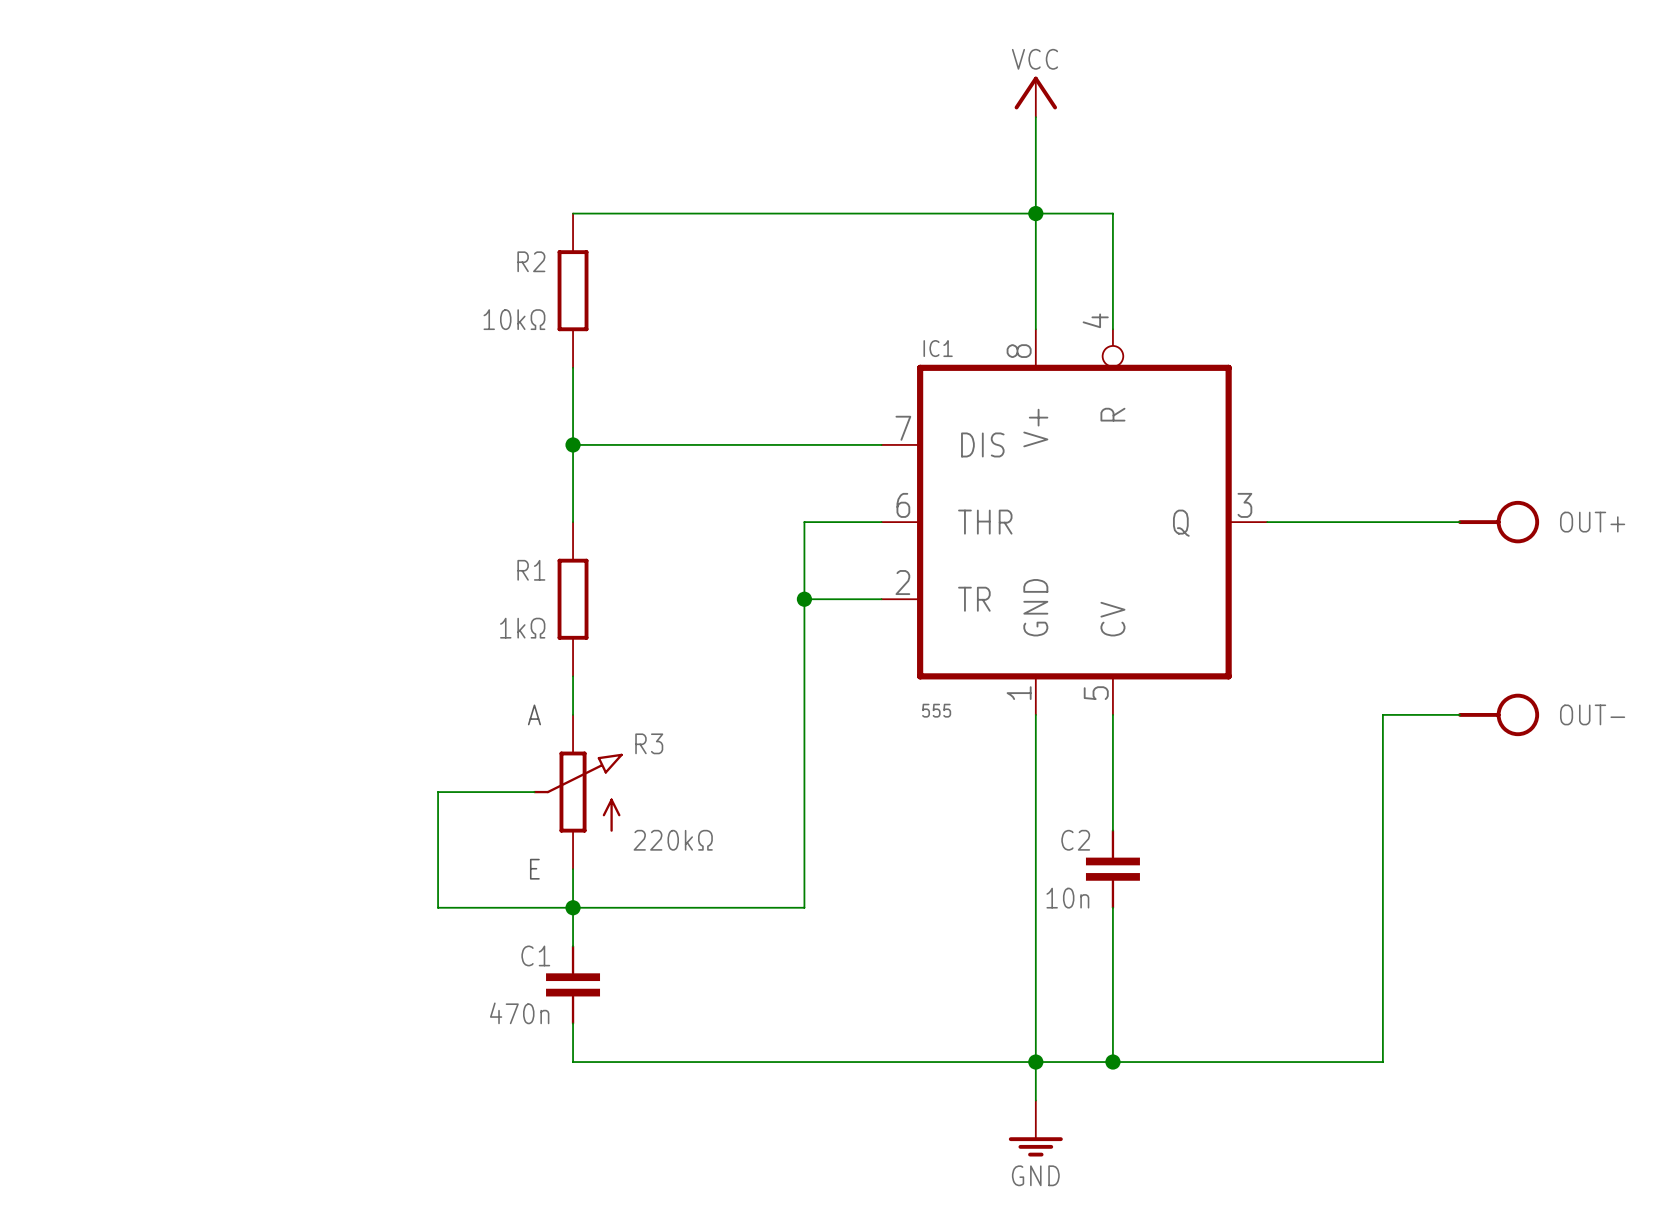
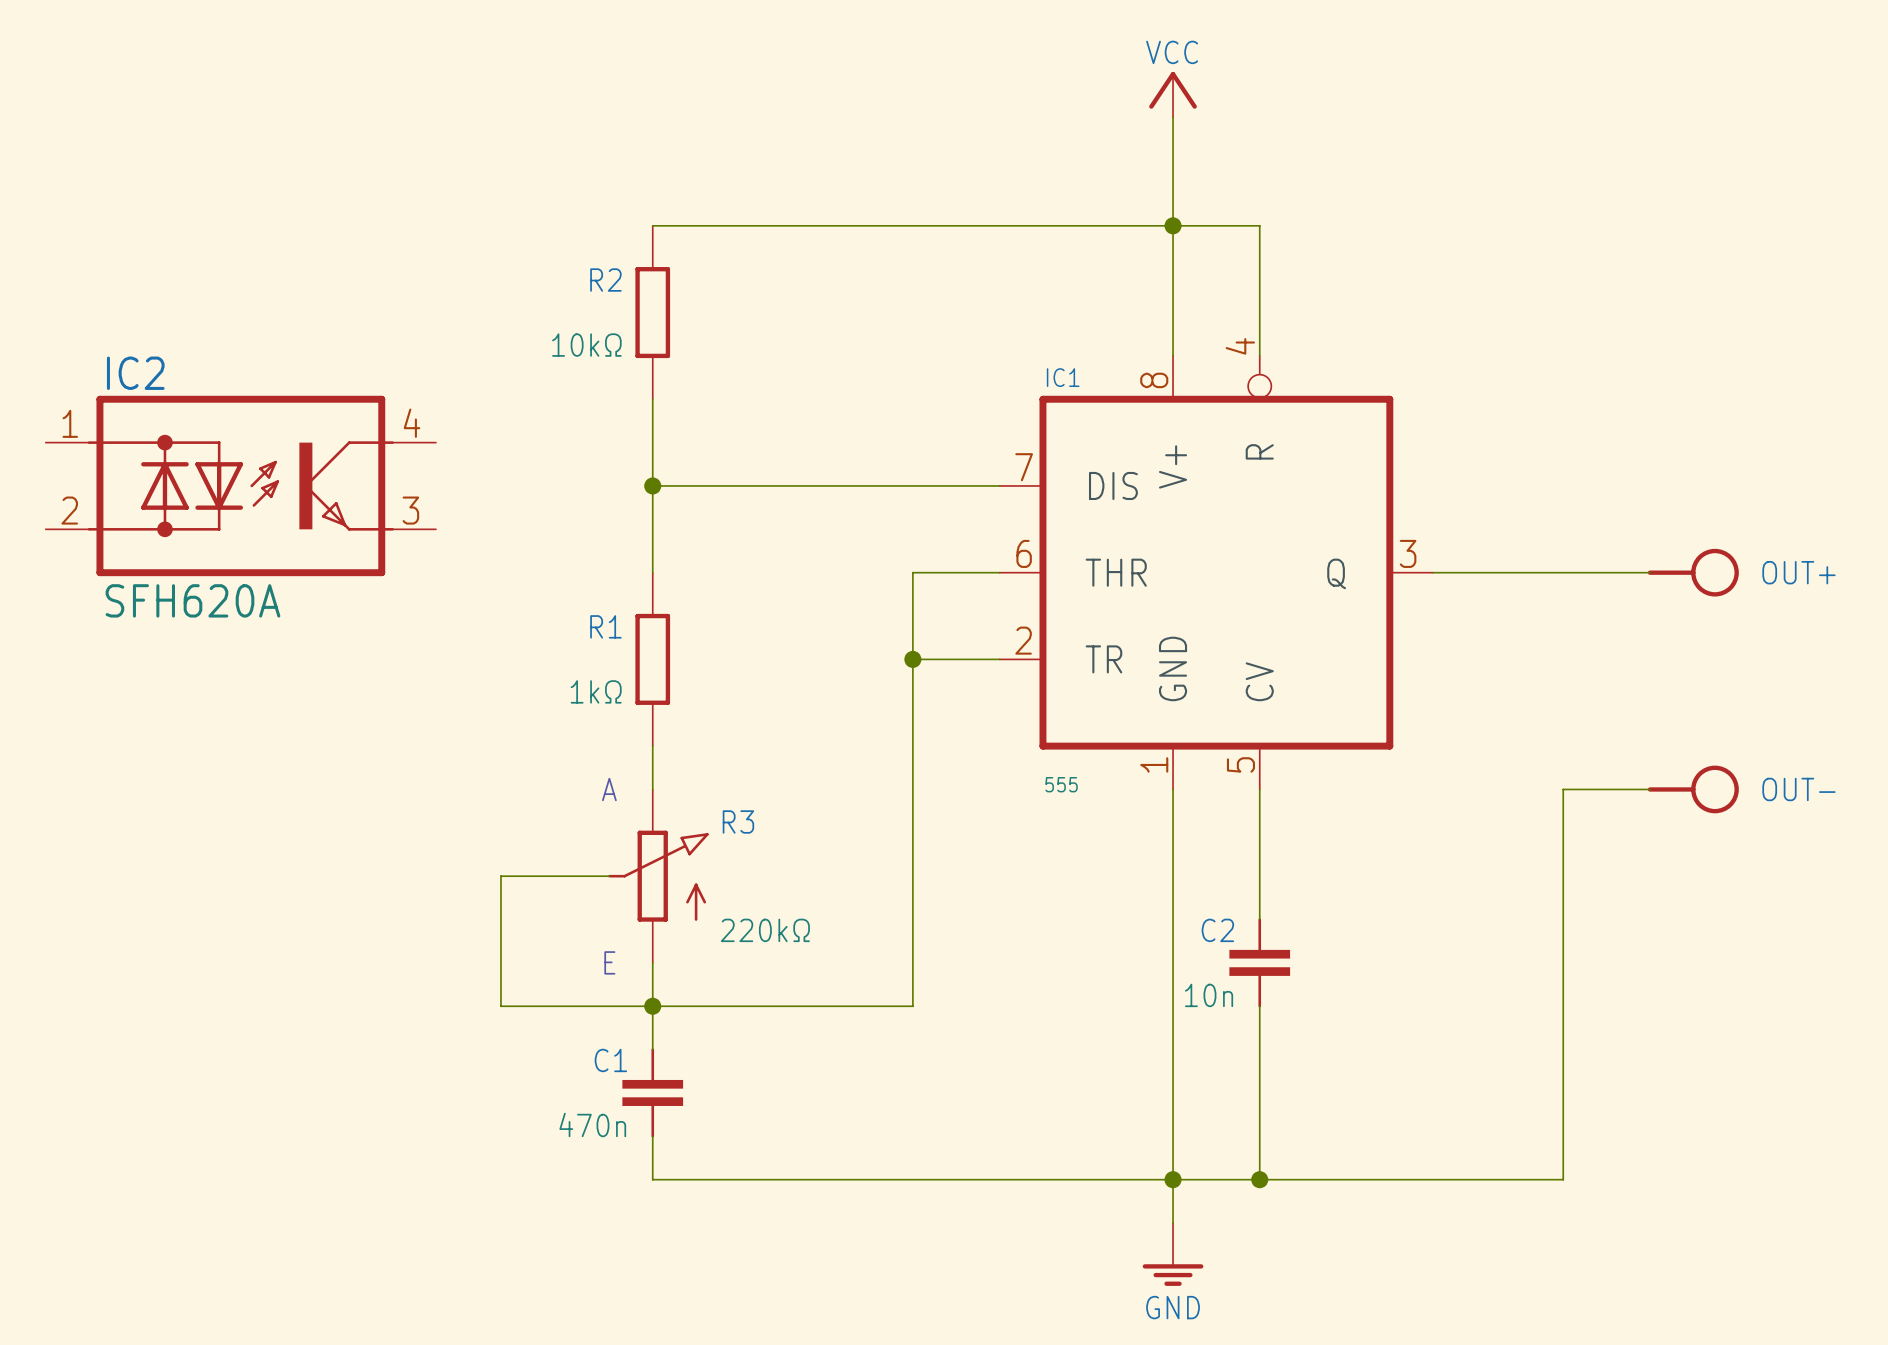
IC2: none -> SFH620A (240, 485)

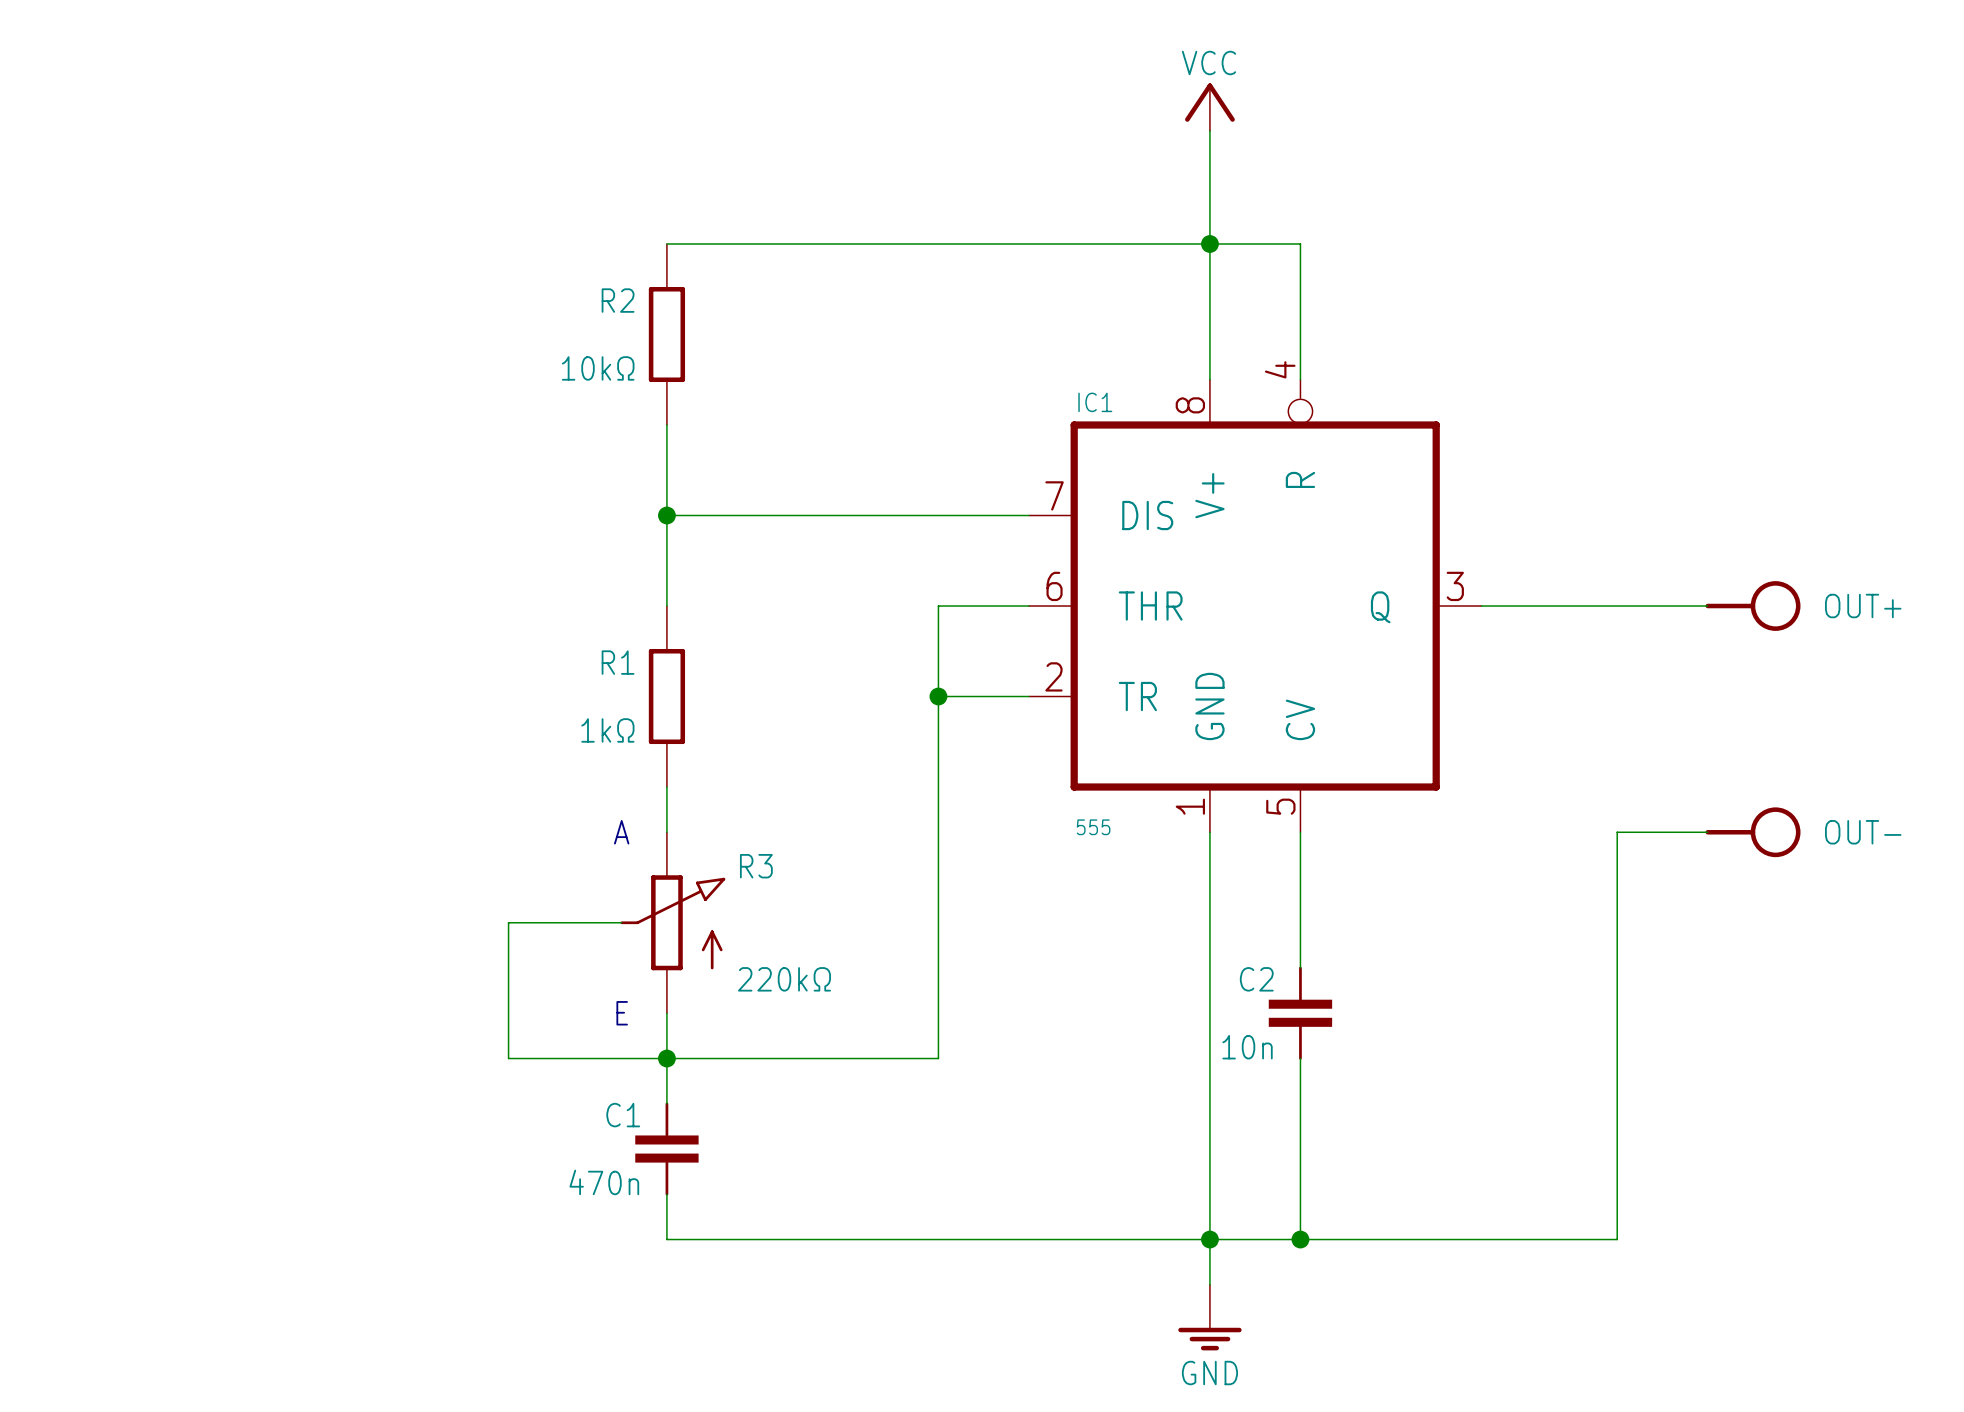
IC2: SFH620A (240, 485) -> none

